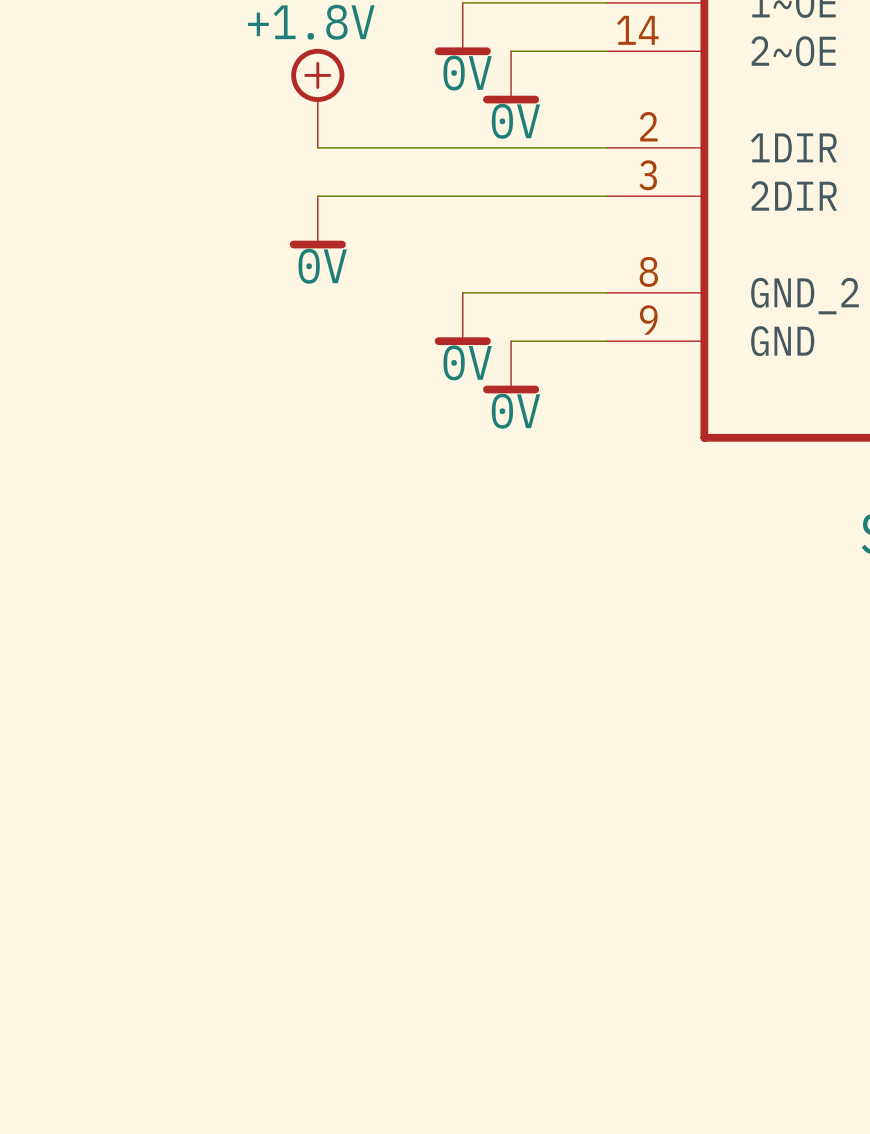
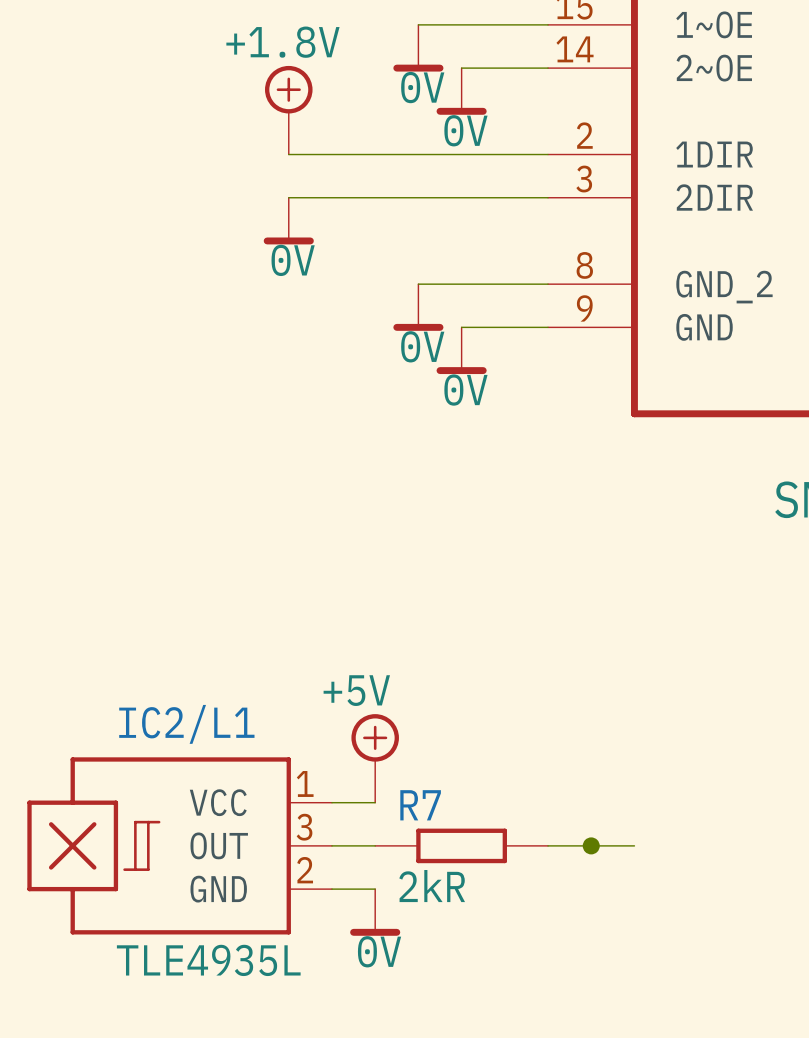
power symbol: none -> +5V (375, 758)
wire: none -> (331, 802) (375, 802)
IC2/L1: none -> TLE4935L (179, 845)
wire: none -> (331, 845) (375, 845)
R7: none -> 2kR (461, 845)
wire: none -> (548, 845) (634, 845)
junction: none -> (591, 845)
wire: none -> (331, 889) (375, 889)
power symbol: none -> 0V (375, 912)

